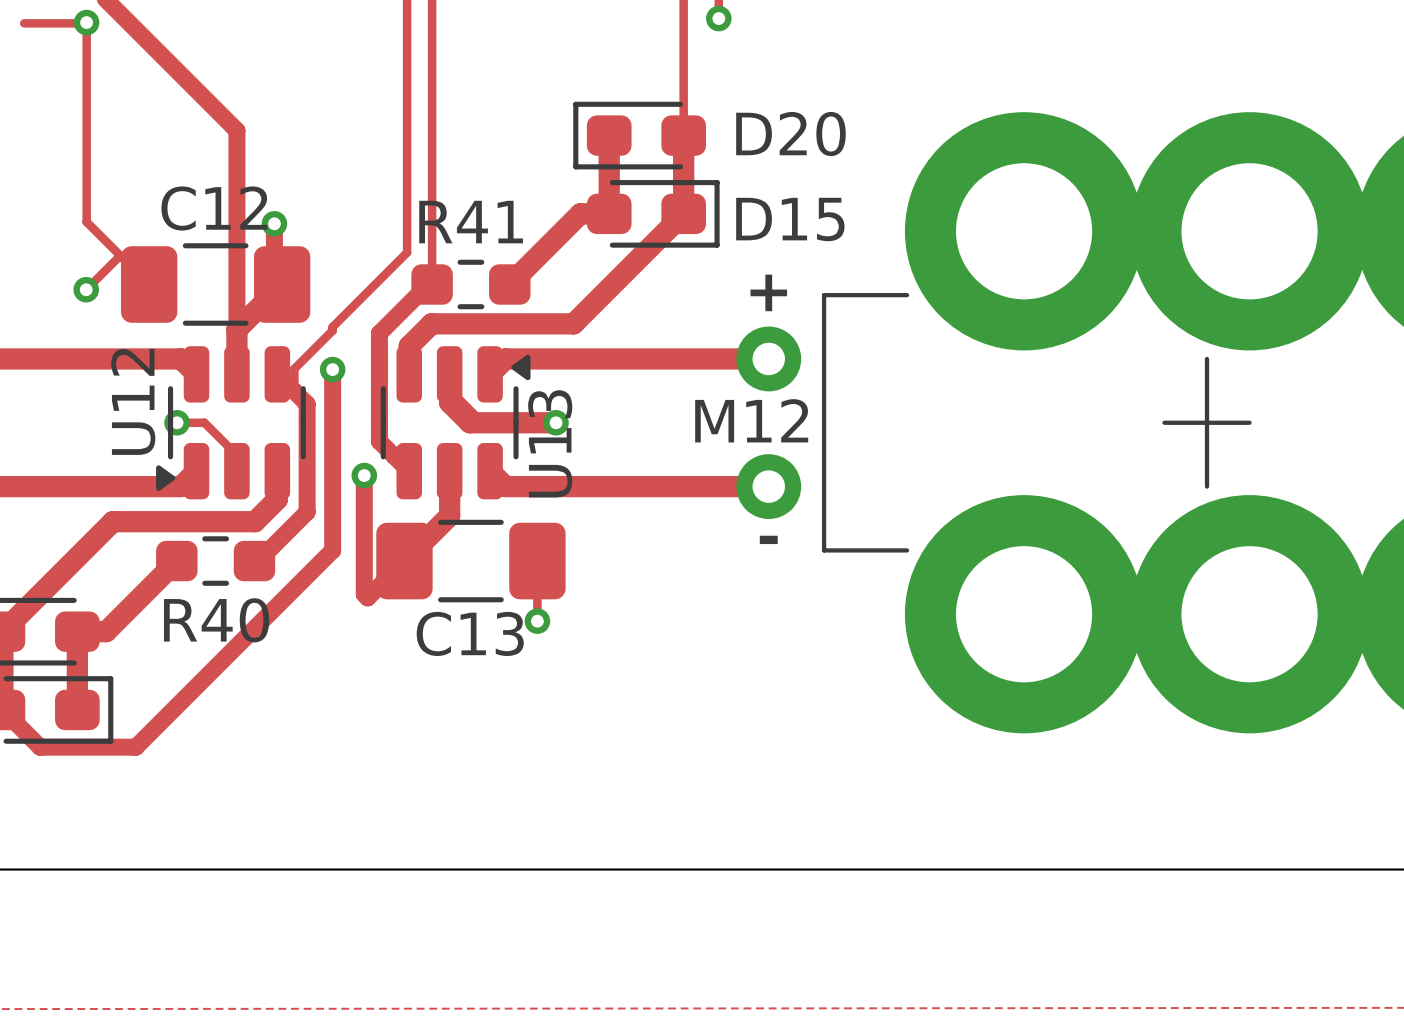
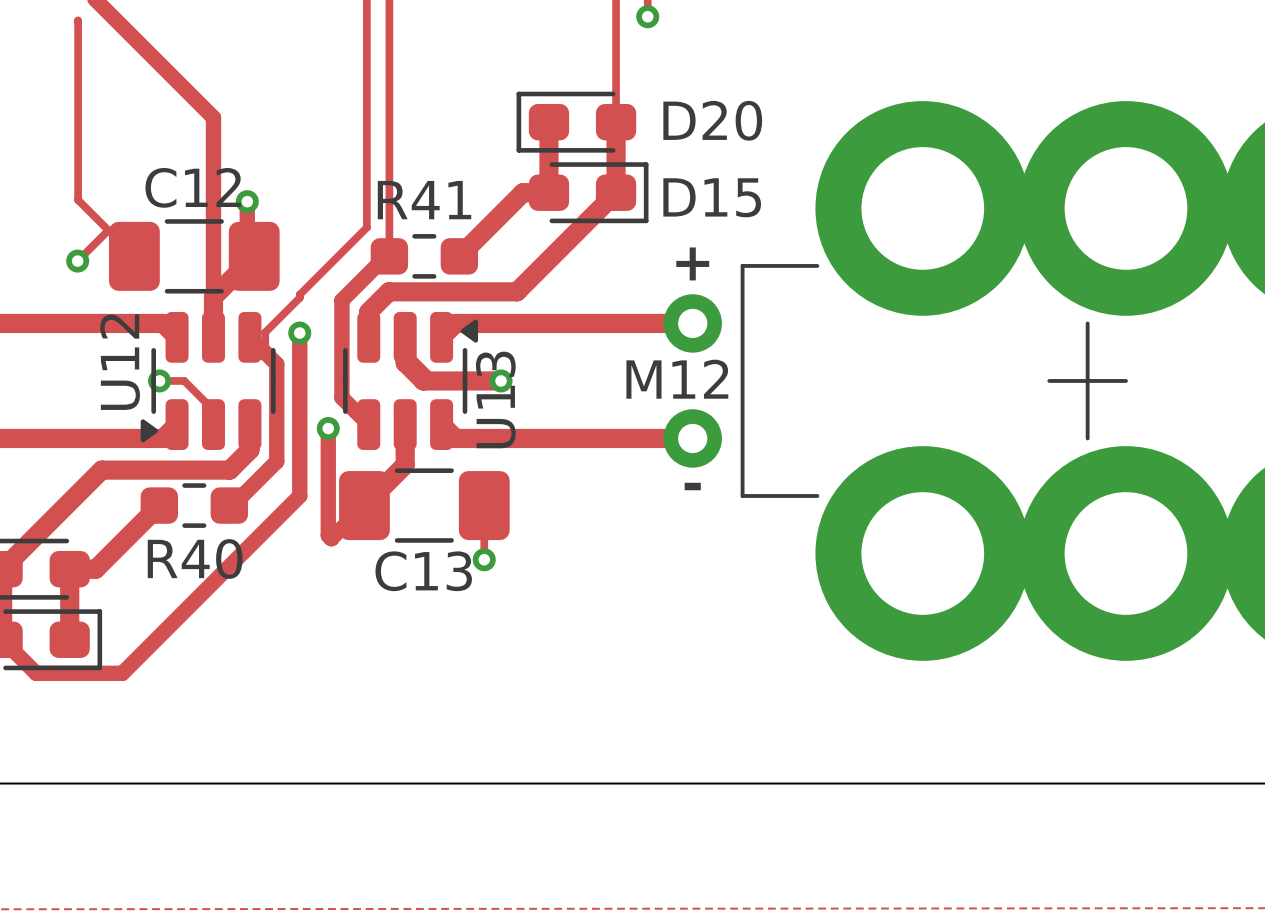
via: (86, 22) -> none
track: (24, 23) (86, 23) -> none

